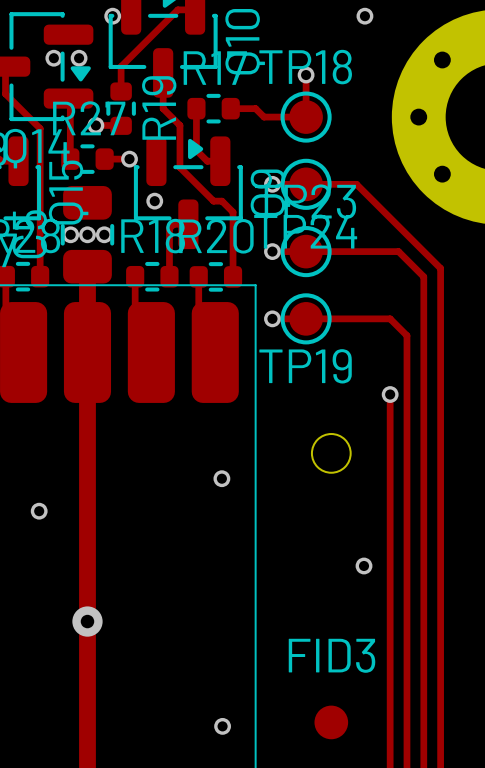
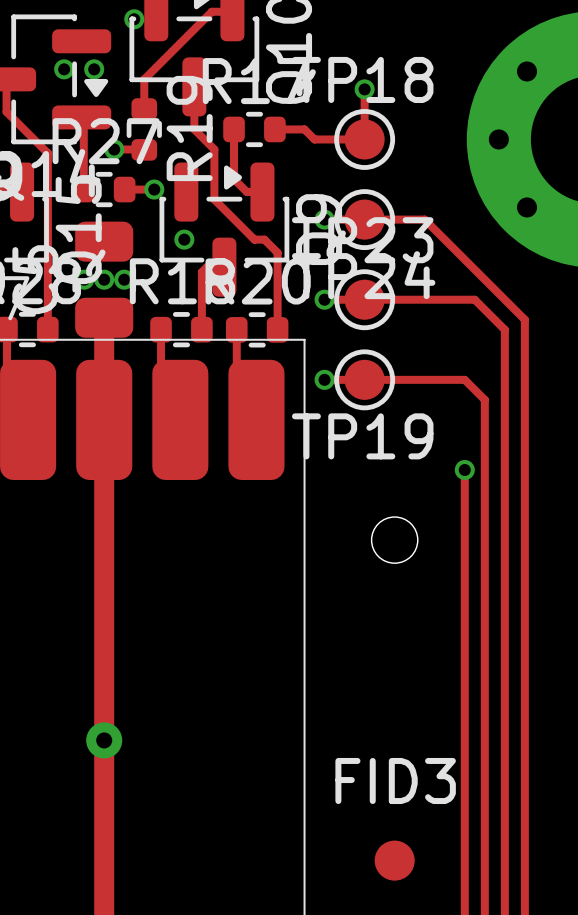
via: (364, 16) -> none
via: (221, 478) -> none
via: (39, 511) -> none
via: (364, 566) -> none
via: (222, 726) -> none

